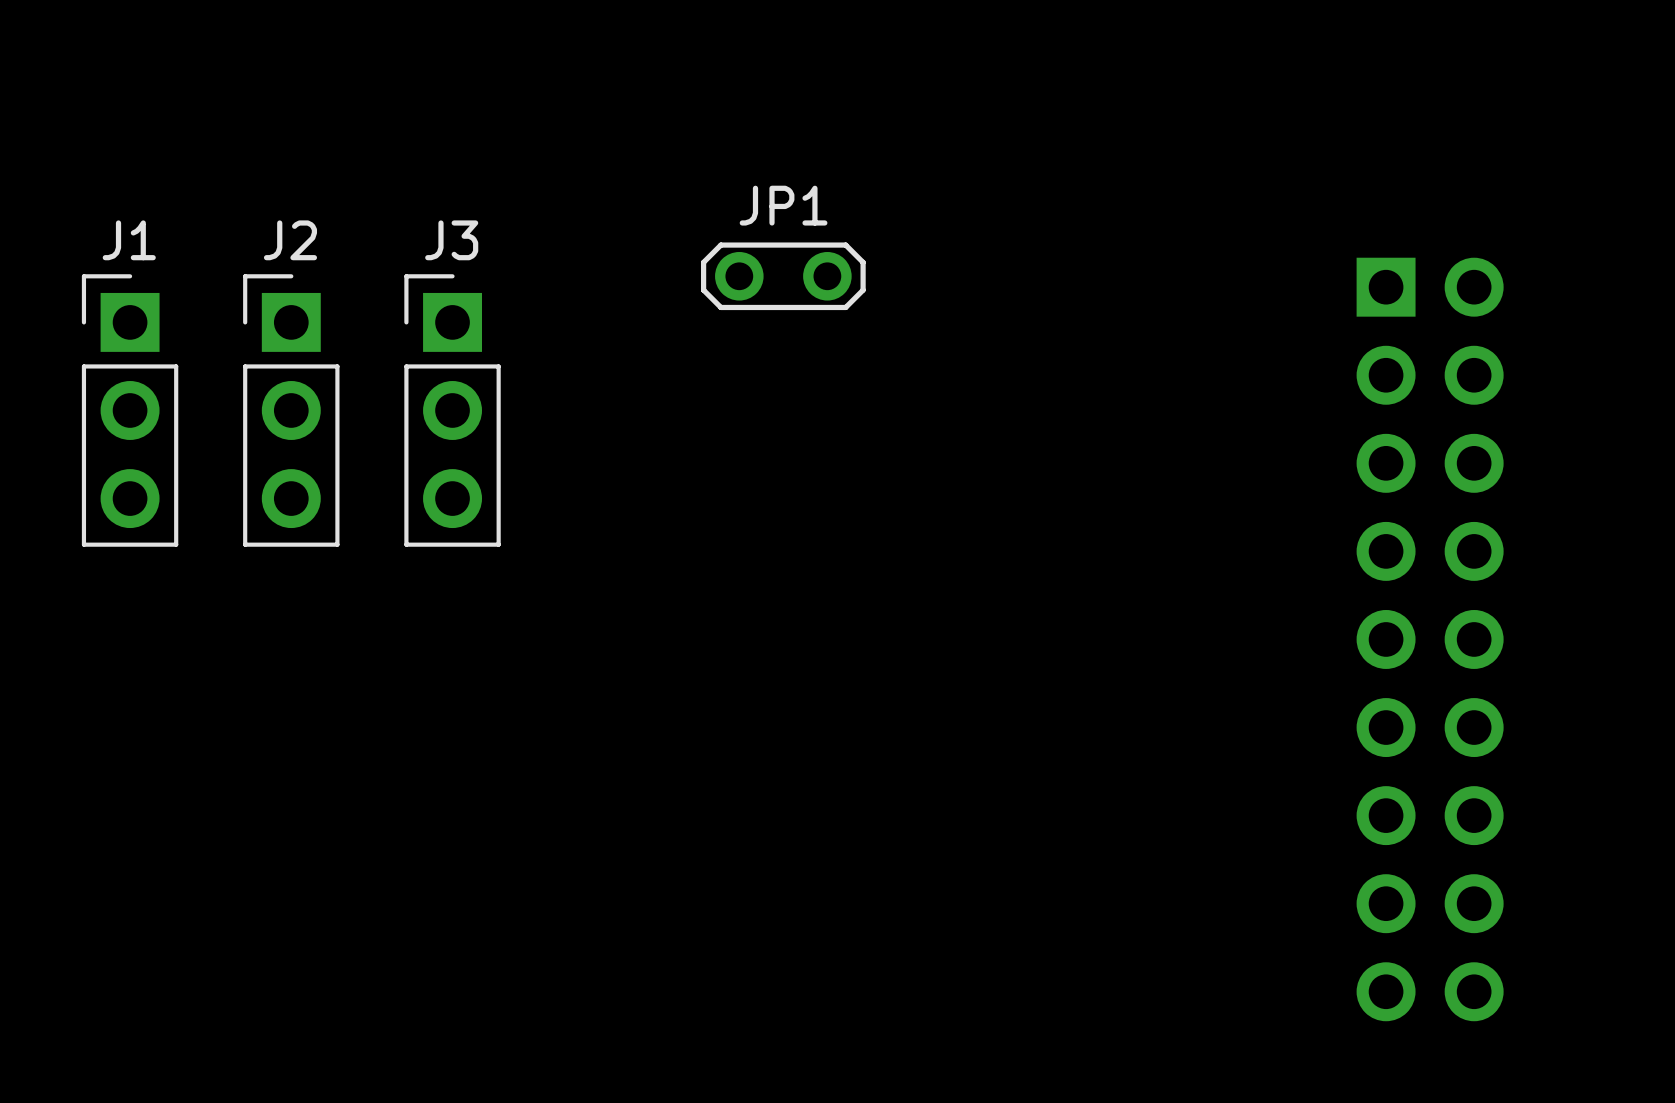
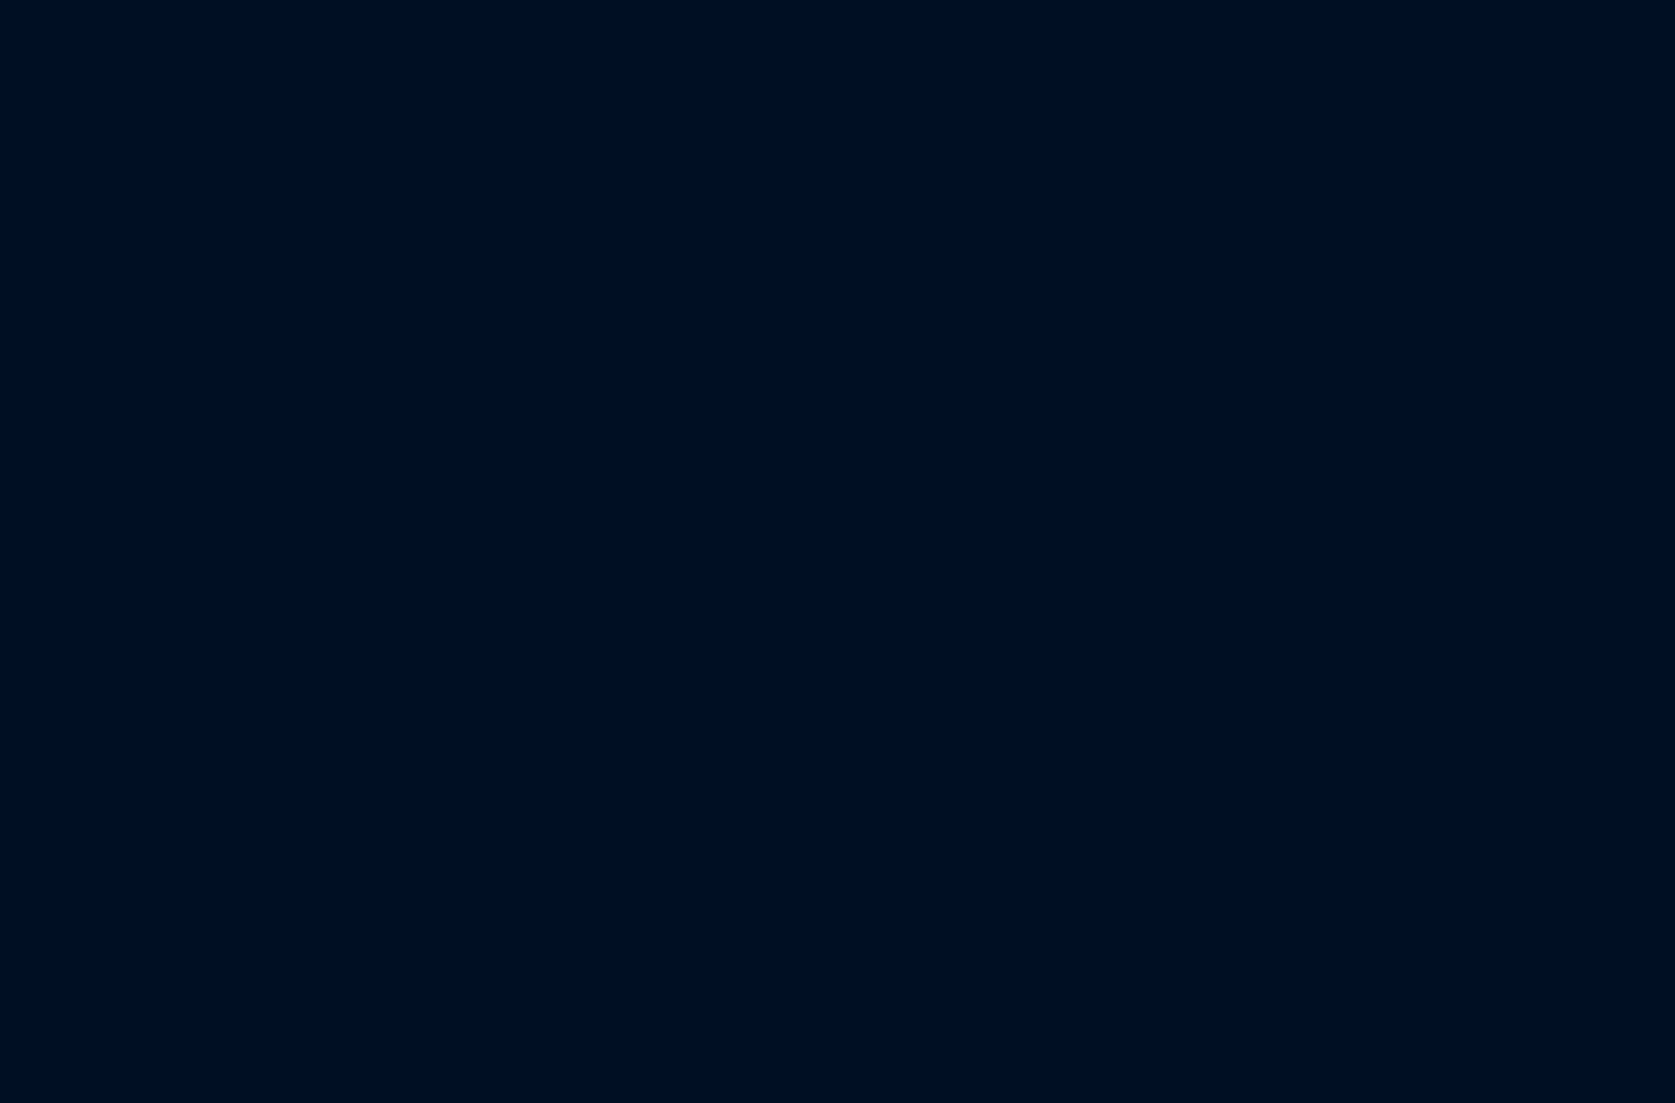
JP1: (783, 276) -> none
J1: (130, 410) -> none
J2: (291, 410) -> none
J3: (452, 410) -> none
part: (1430, 639) -> none

